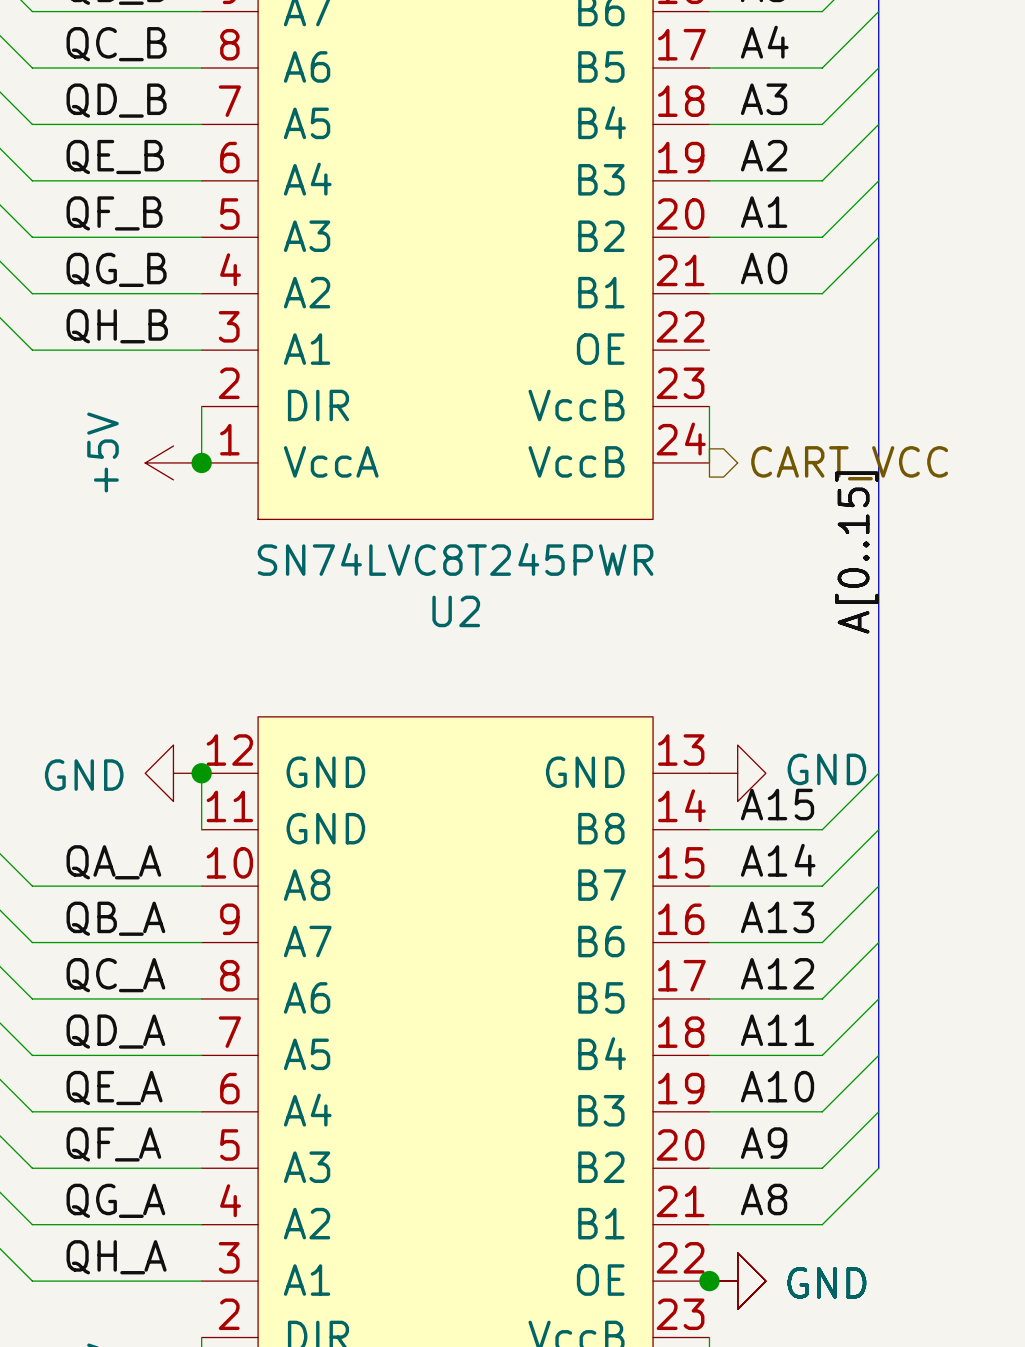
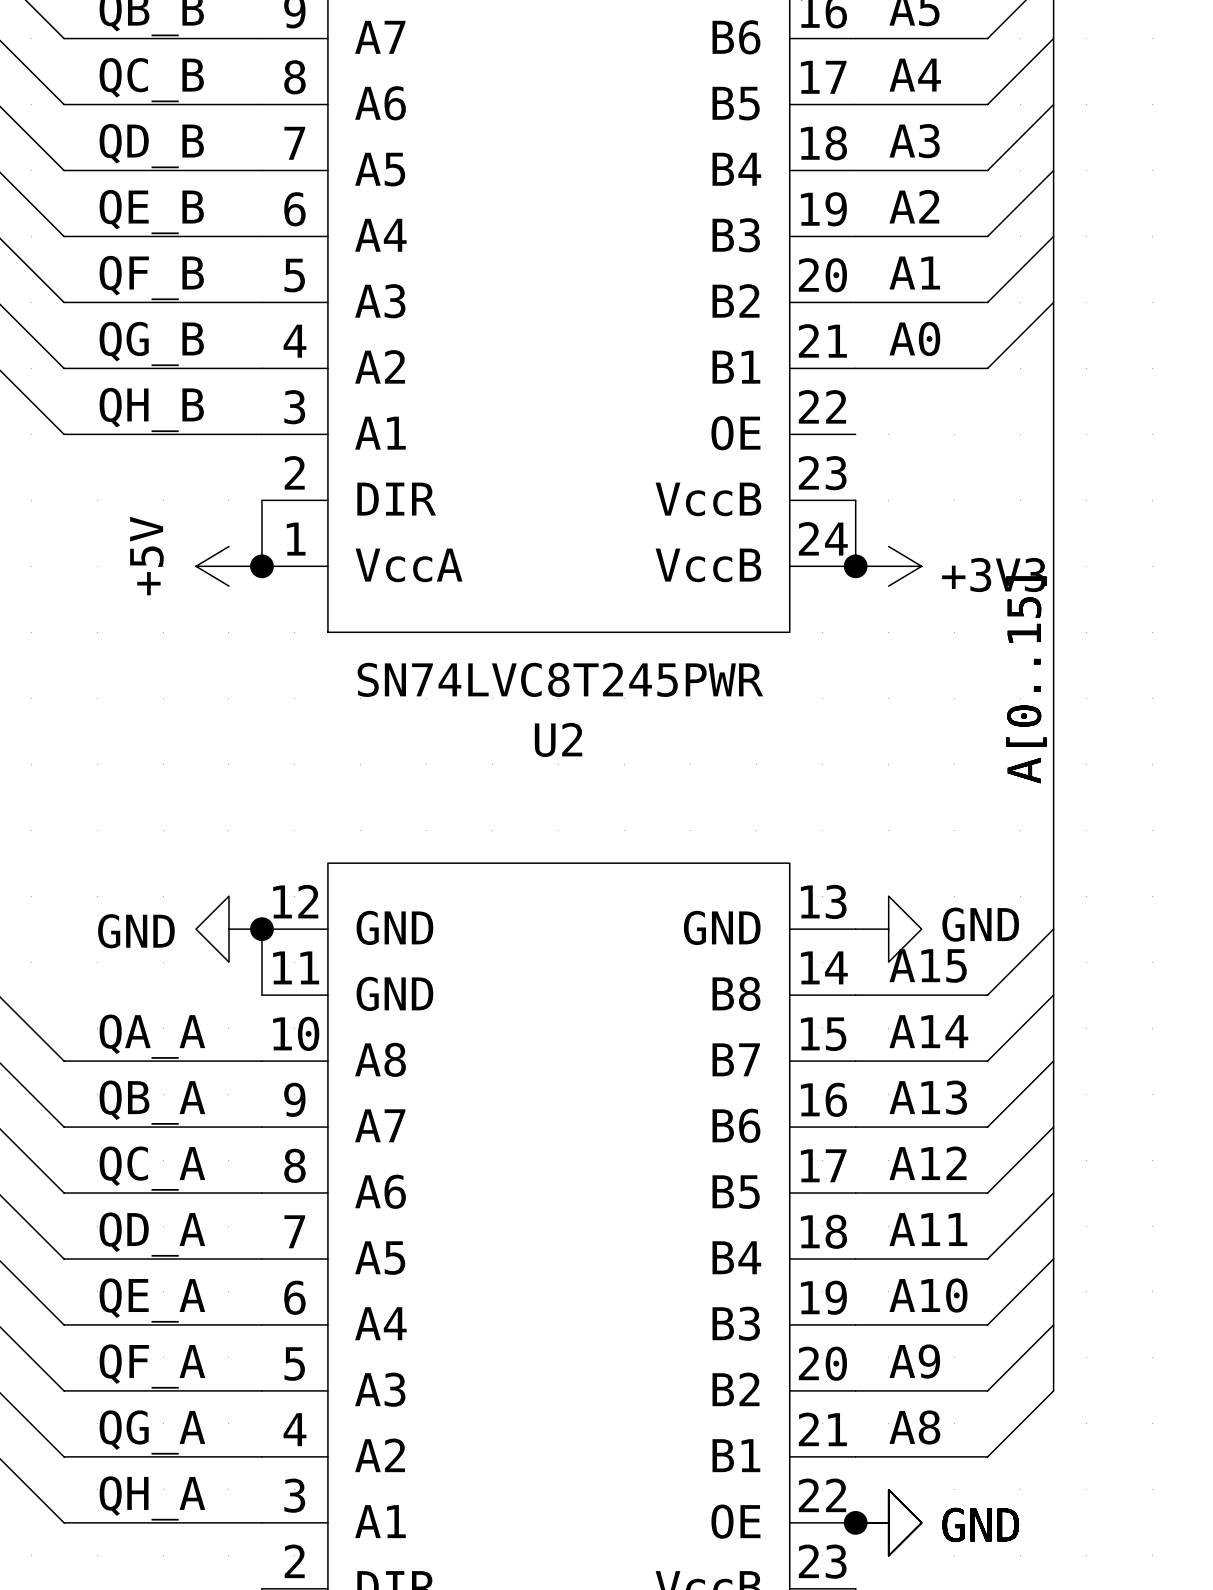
junction: none -> (855, 566)
power symbol: none -> +3V3 (888, 566)
hierarchical label: CART_VCC (849, 463) -> none

